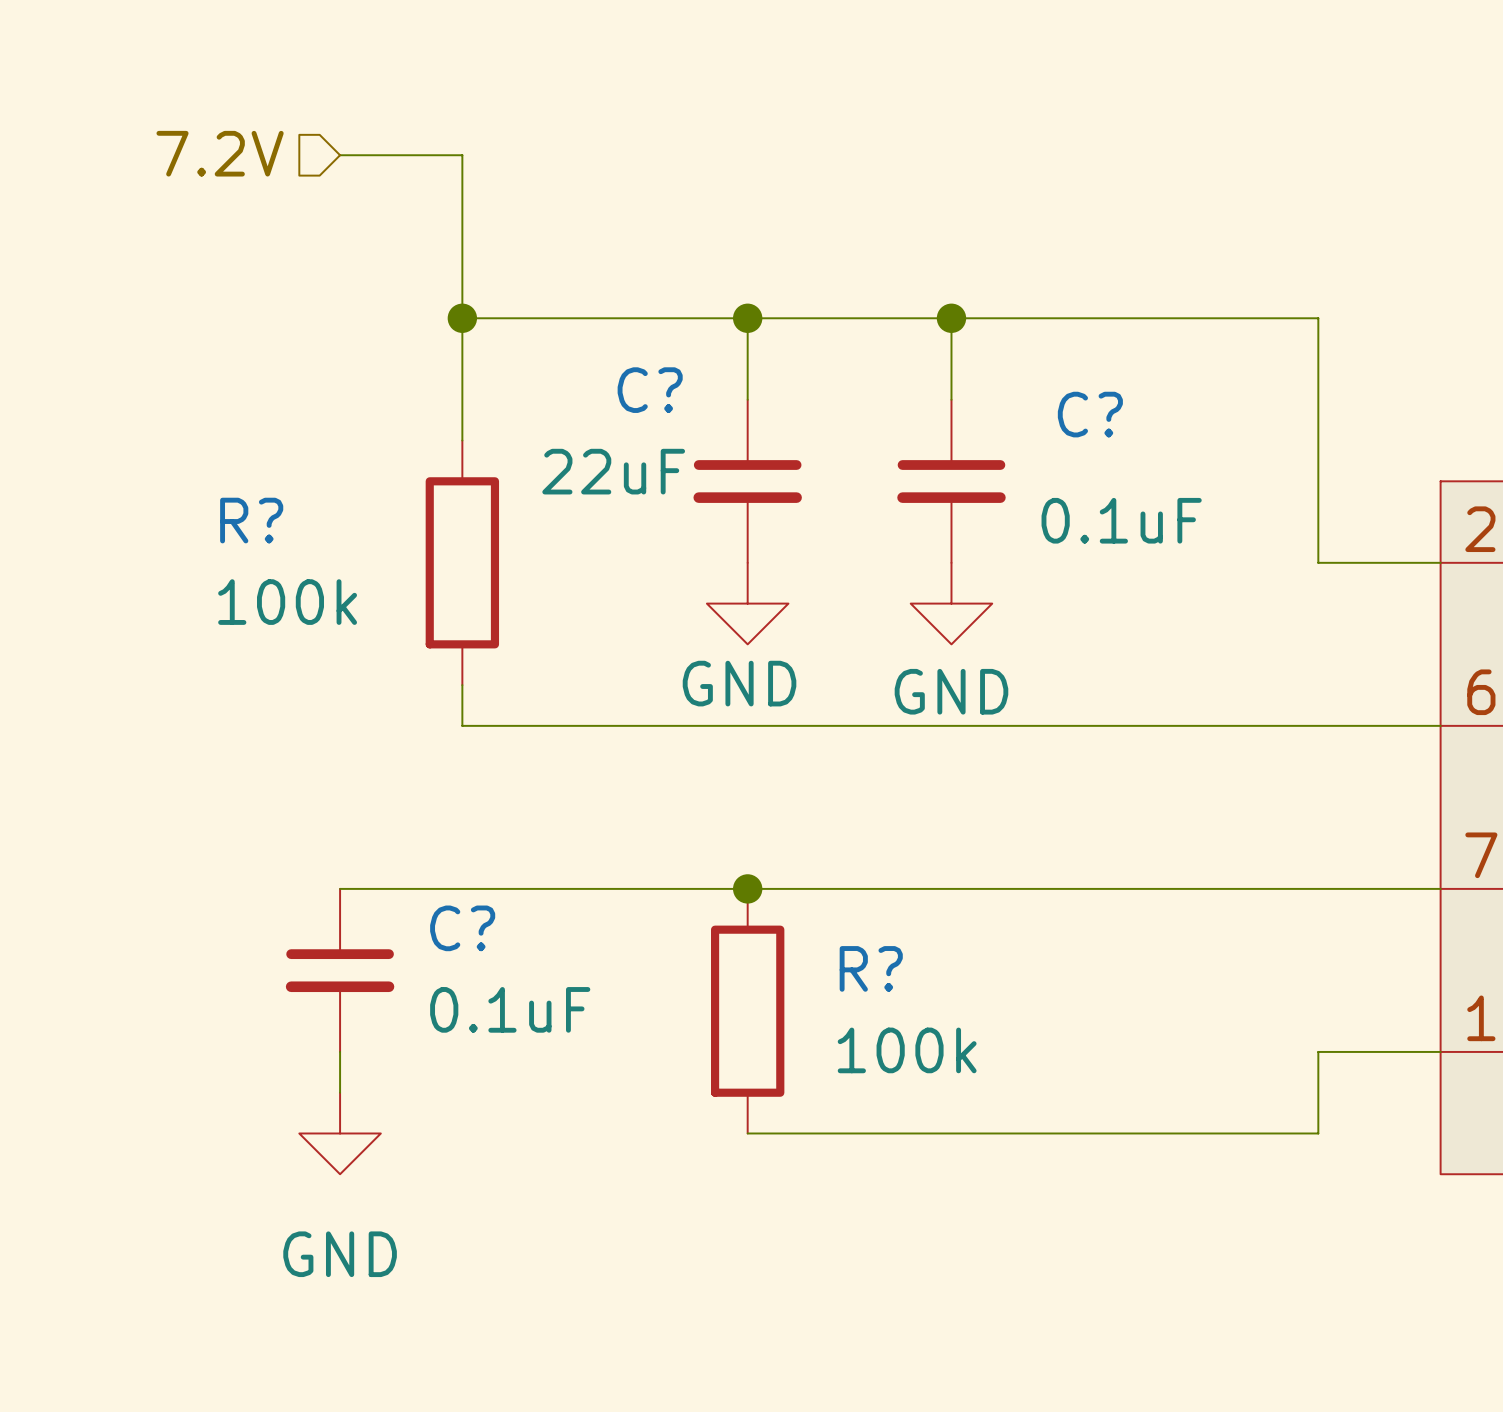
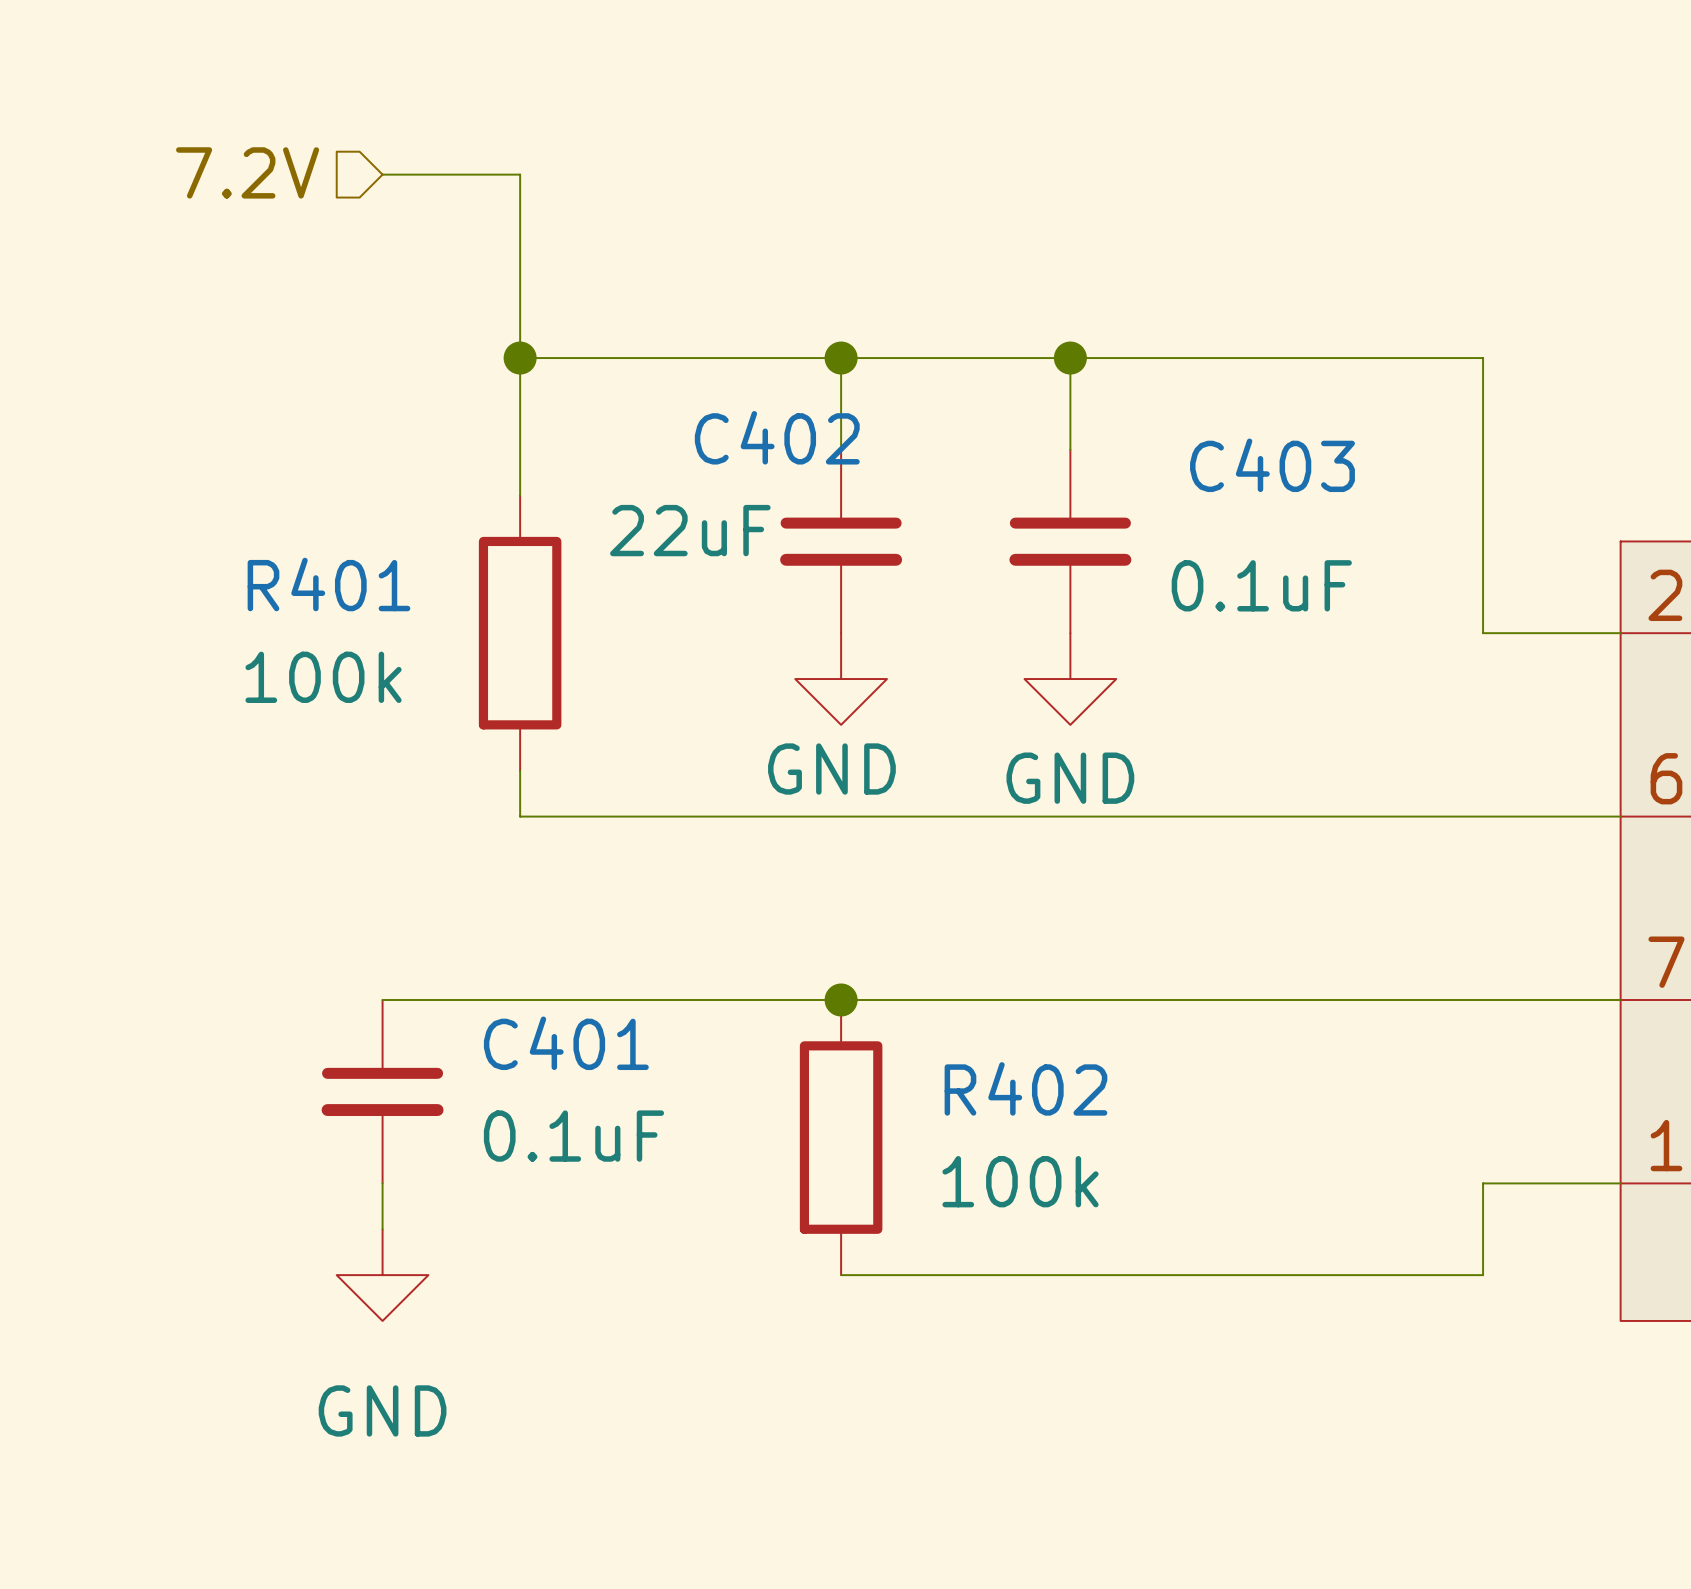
C? name: C? (650, 390) -> C402 (777, 437)
C? name: C? (1090, 414) -> C403 (1272, 465)
R? name: R? (251, 520) -> R401 (328, 584)
C? name: C? (462, 928) -> C401 (566, 1043)
R? name: R? (871, 968) -> R402 (1025, 1088)

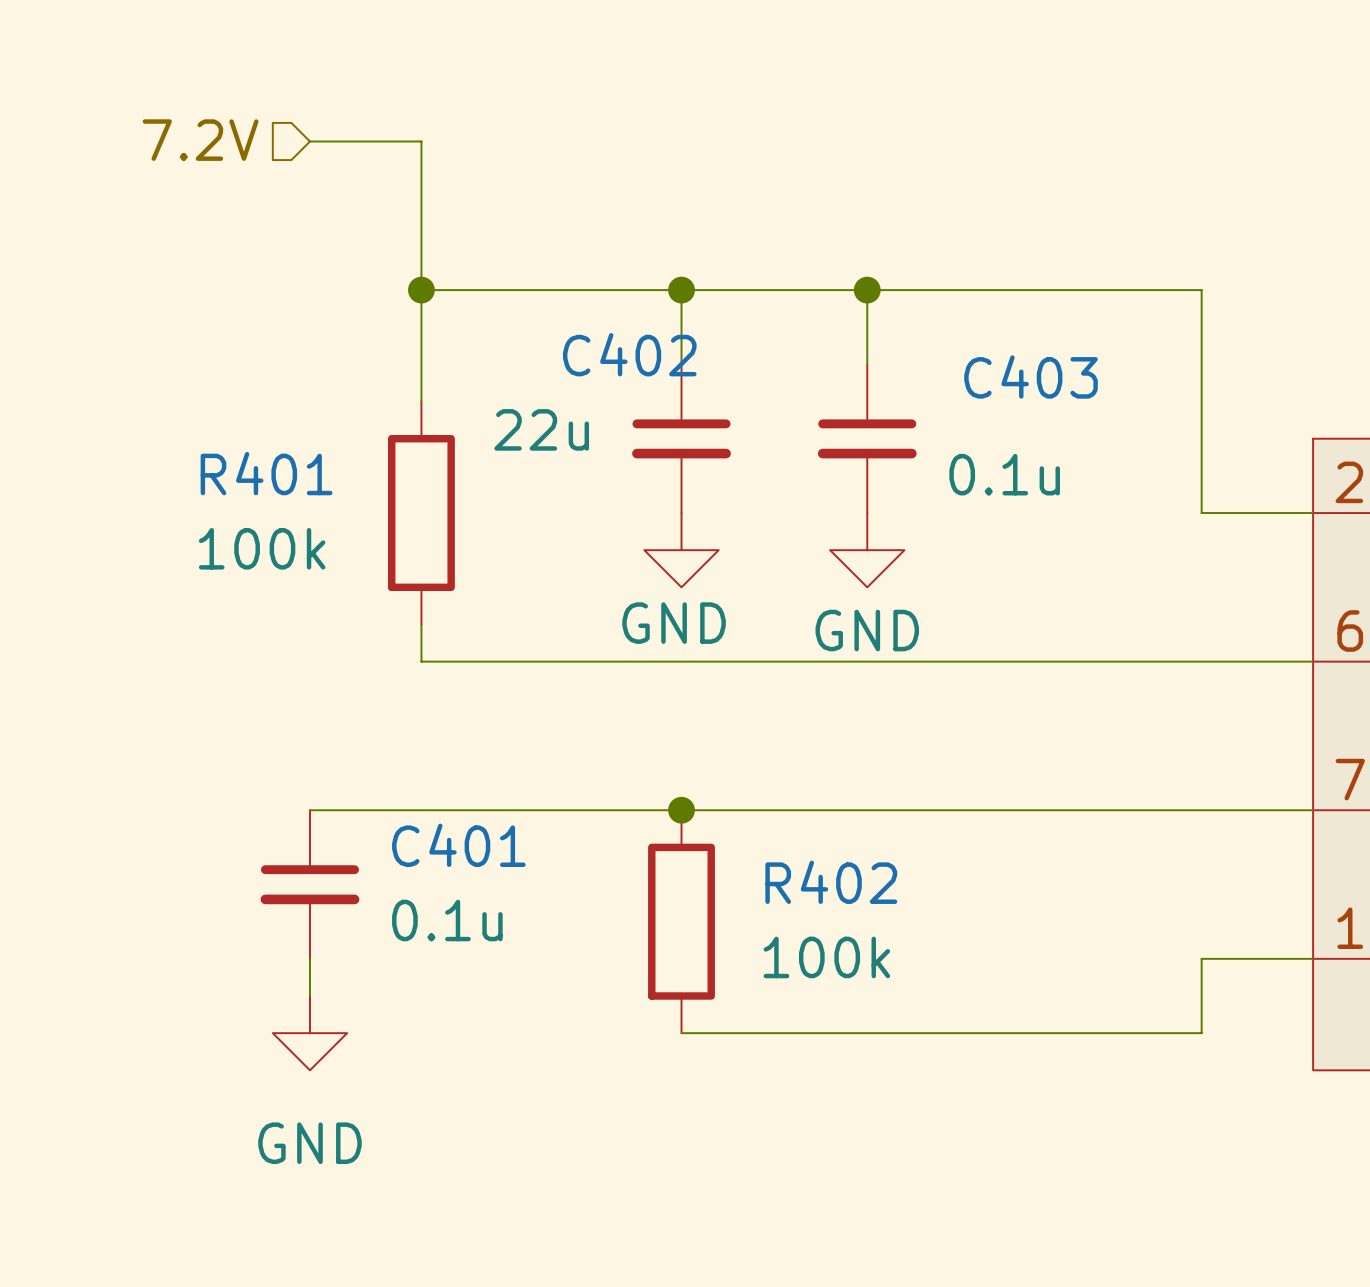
C402 value: 22uF (690, 530) -> 22u (541, 429)
C403 value: 0.1uF (1261, 585) -> 0.1u (1004, 474)
C401 value: 0.1uF (573, 1136) -> 0.1u (447, 920)

